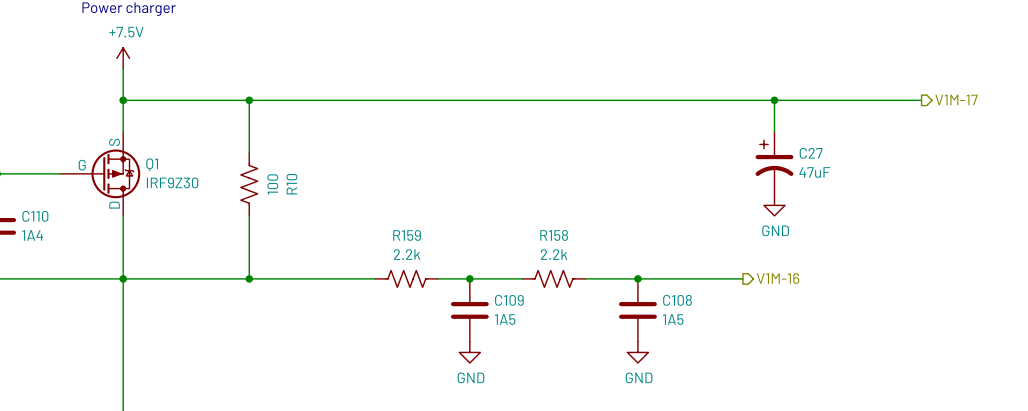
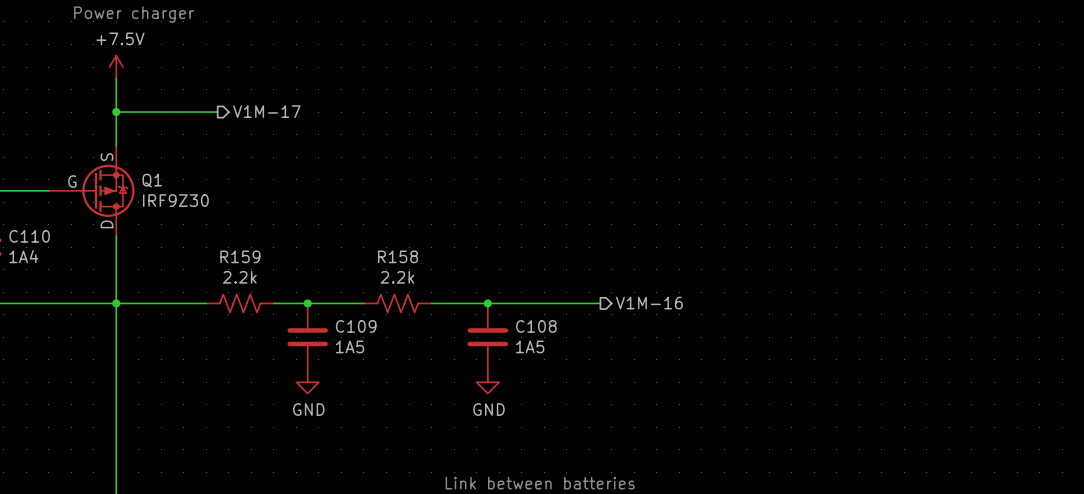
hierarchical label: none -> V1M-17 (266, 111)
hierarchical label: V1M-17 (956, 99) -> none
wire: (217, 100) (921, 100) -> none
wire: (249, 100) (249, 152) -> none
junction: (249, 100) -> none
wire: (774, 100) (774, 131) -> none
junction: (774, 100) -> none
C27: 47uF (774, 163) -> none
R10: 100 (249, 184) -> none
power symbol: GND (774, 205) -> none
wire: (249, 215) (249, 278) -> none
junction: (249, 278) -> none
junction: none -> (307, 303)
R159 position: (406, 278) -> (240, 303)
wire: none -> (544, 303) (600, 303)
R158 position: (553, 278) -> (397, 303)
wire: (585, 278) (742, 278) -> none
junction: (637, 278) -> none
hierarchical label position: V1M-16 (778, 278) -> V1M-16 (649, 303)
C109 name: C109 (509, 300) -> C108 (536, 326)
C109: none -> 1A5 (307, 337)
C108: 1A5 (637, 310) -> none
power symbol: none -> GND (307, 382)
power symbol: GND (637, 352) -> none

